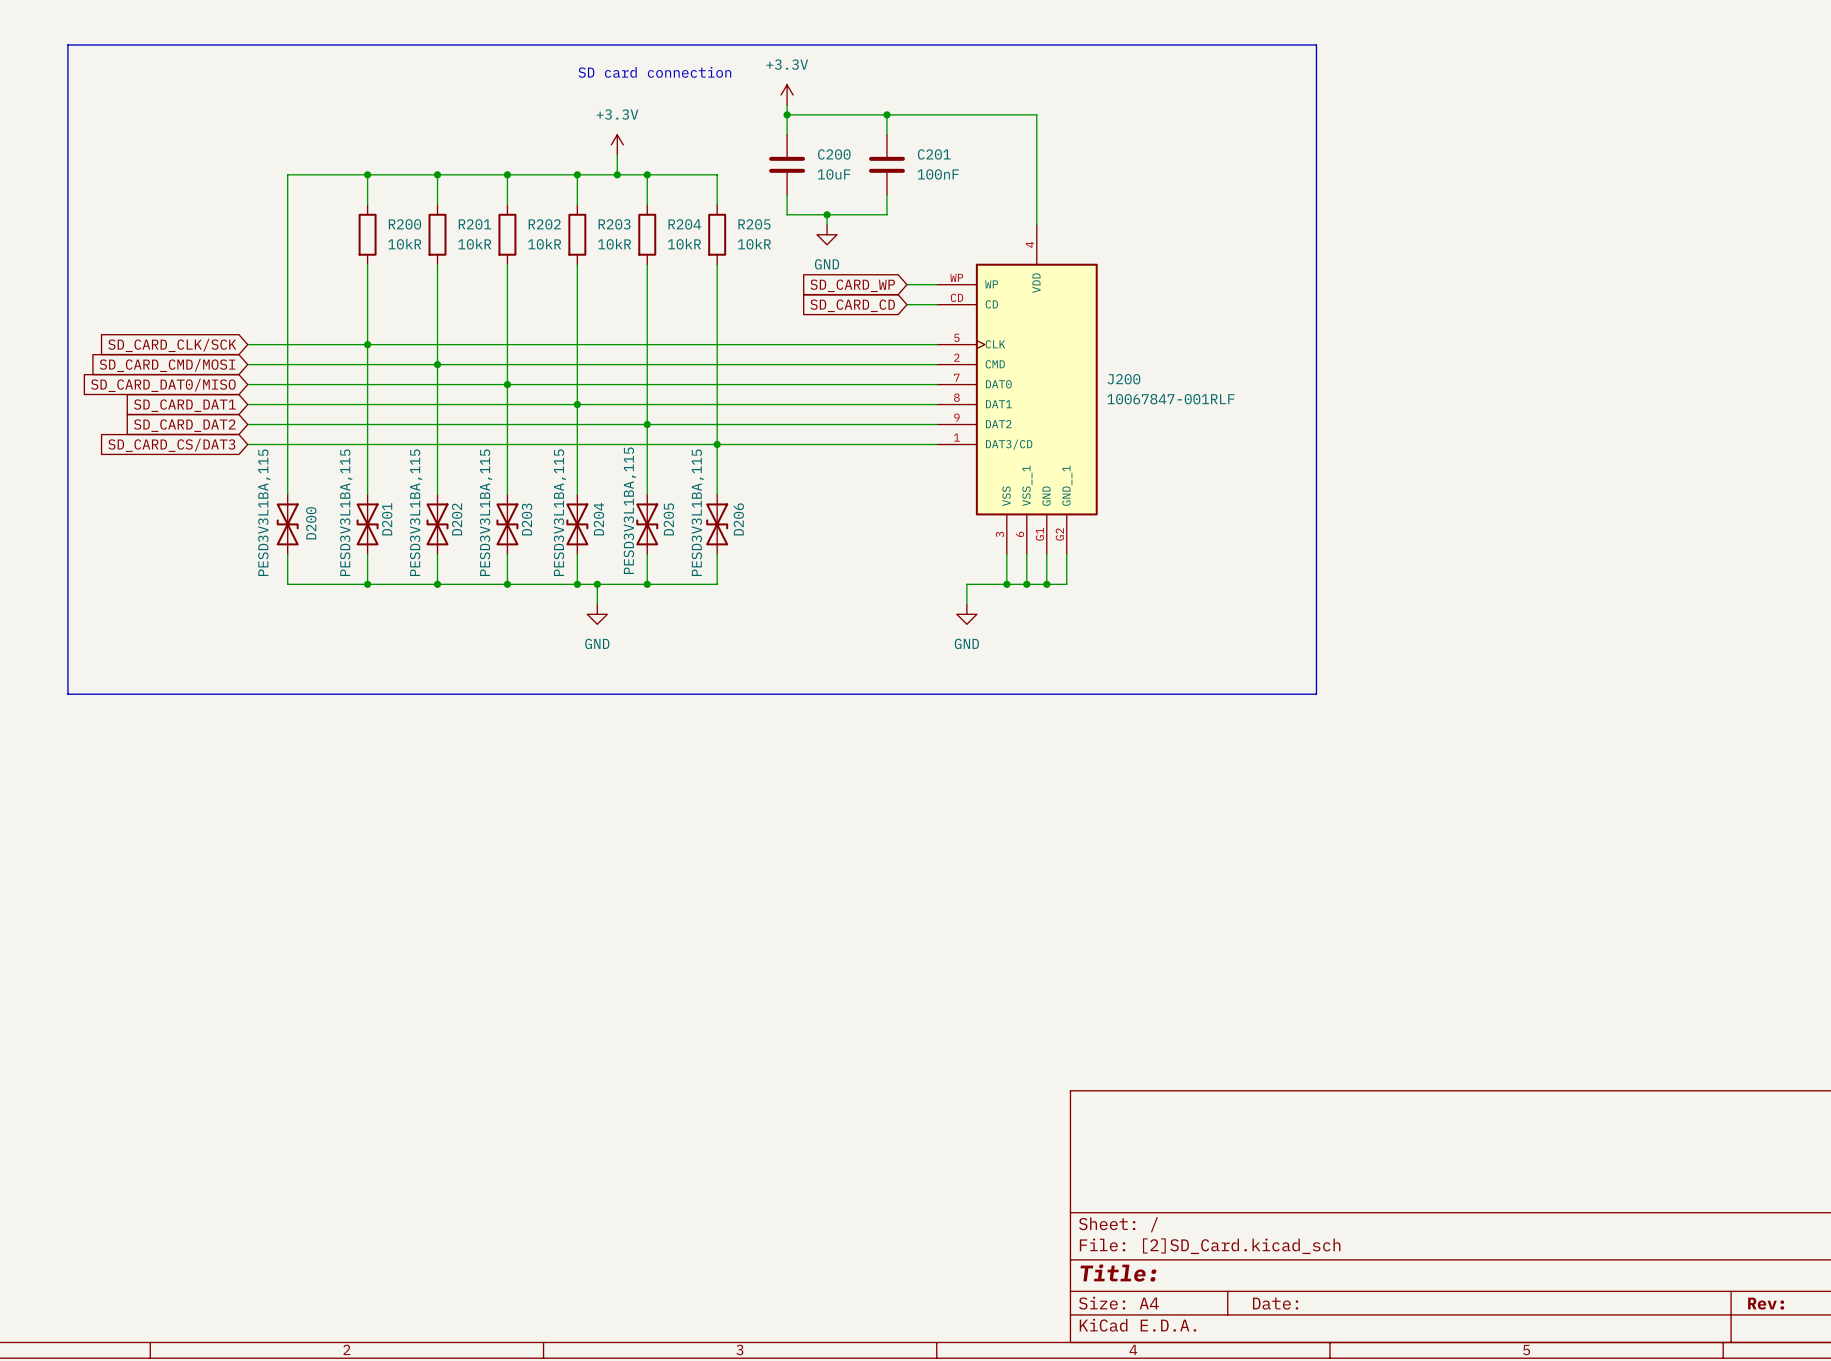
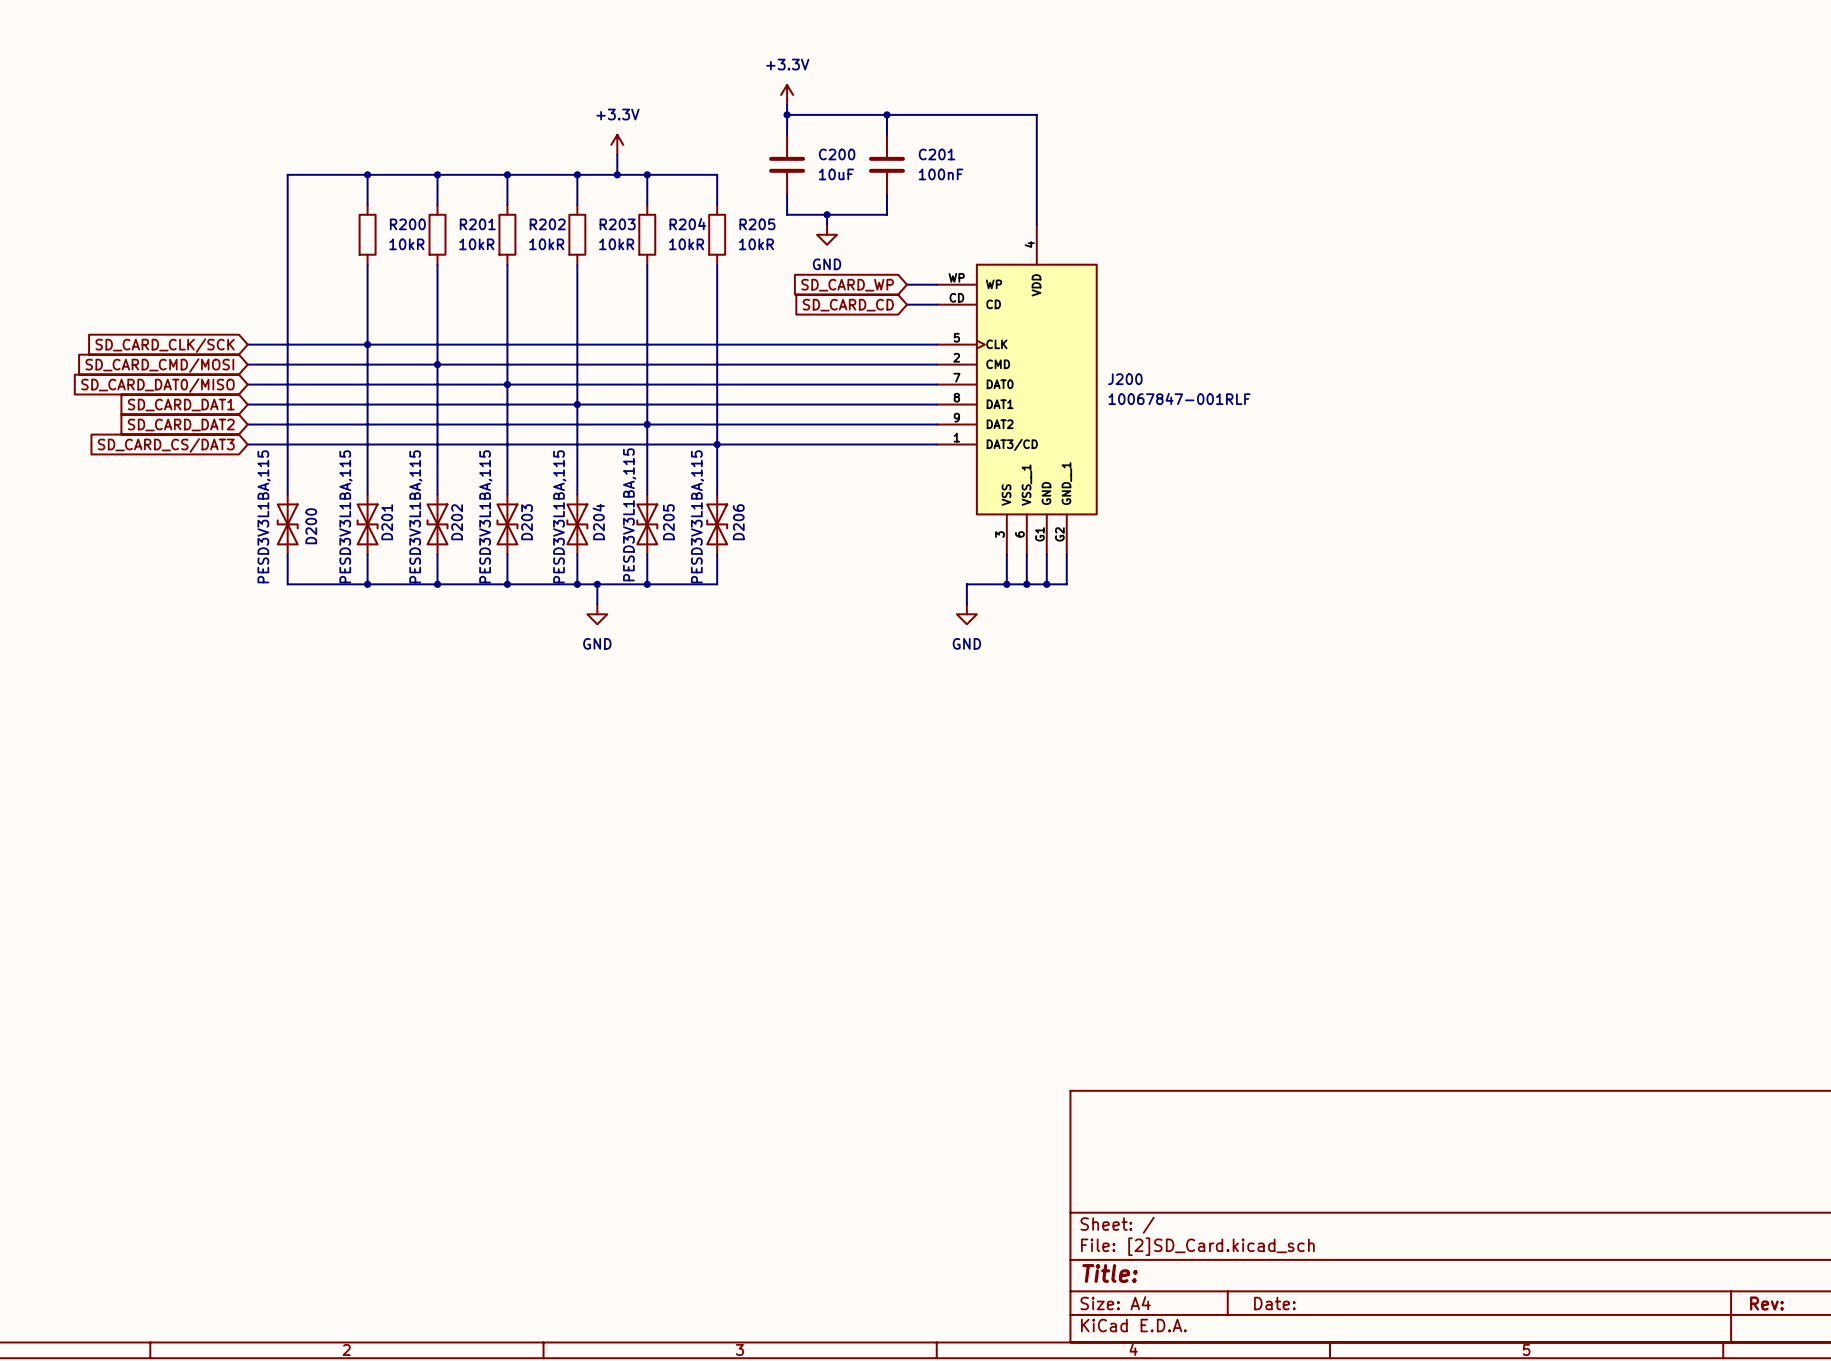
line: (67, 44) (1316, 44) (1316, 694) (67, 694) (67, 44) -> none
text: SD card connection (654, 72) -> none

